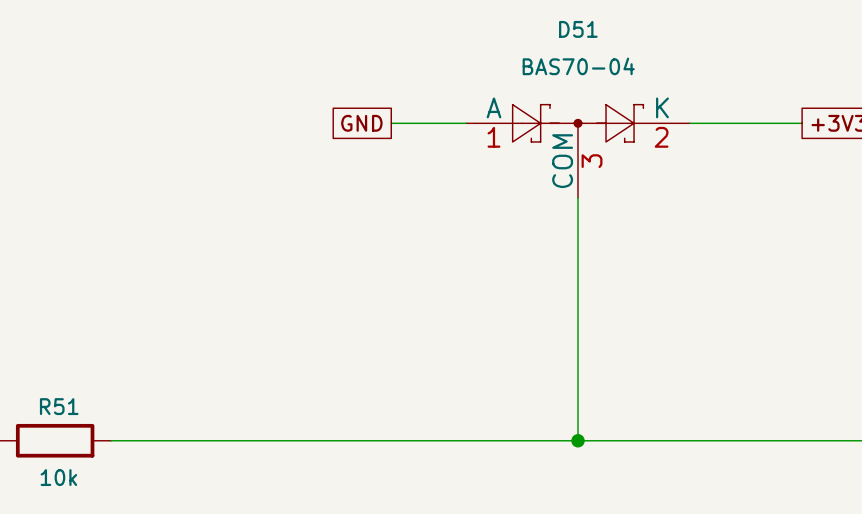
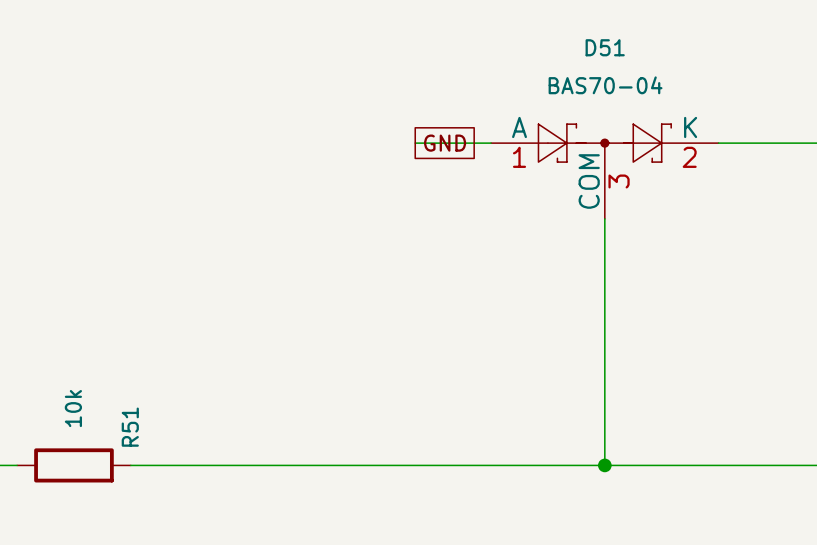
global label rotation: 0° (361, 123) -> 180° (445, 143)
R51 name rotation: 0° (59, 406) -> 90° counterclockwise (130, 427)
R51 name position: R51 (59, 406) -> R51 (130, 427)
R51 value rotation: 0° (58, 477) -> 90° counterclockwise (73, 408)
R51 value position: 10k (58, 477) -> 10k (73, 408)

